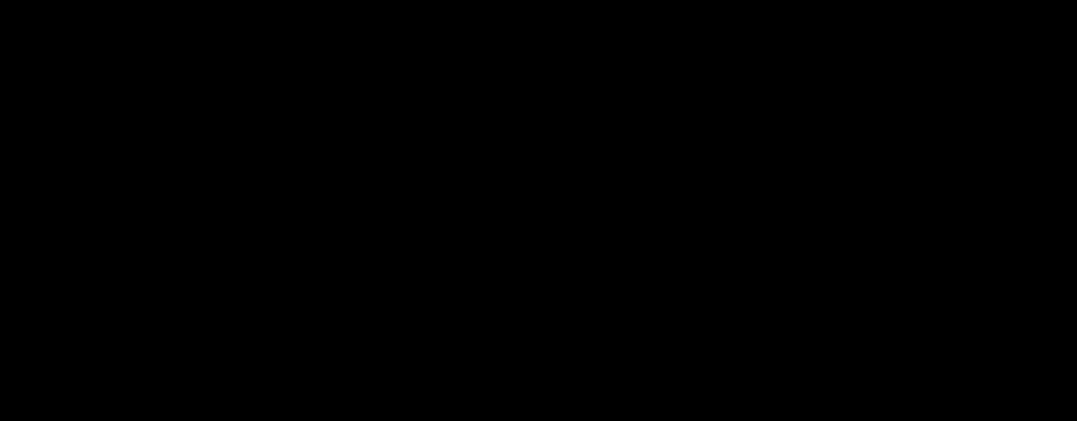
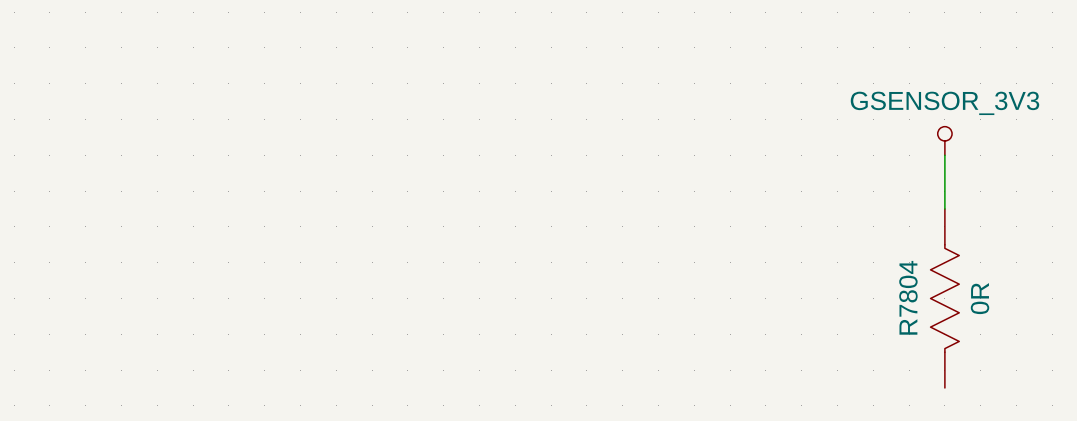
power symbol: none -> GSENSOR_3V3 (944, 140)
wire: none -> (944, 155) (944, 208)
R7804: none -> 0R (944, 298)

